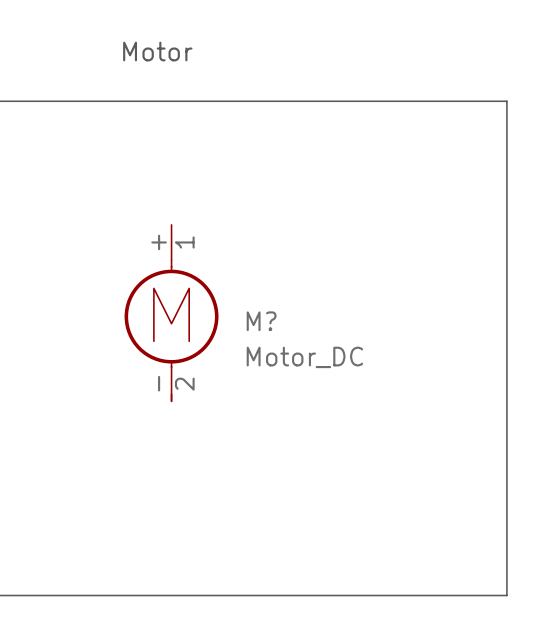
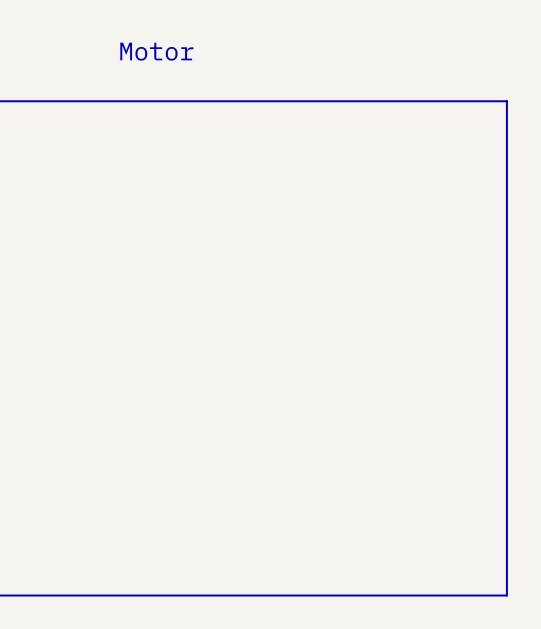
M?: Motor_DC (171, 313) -> none

